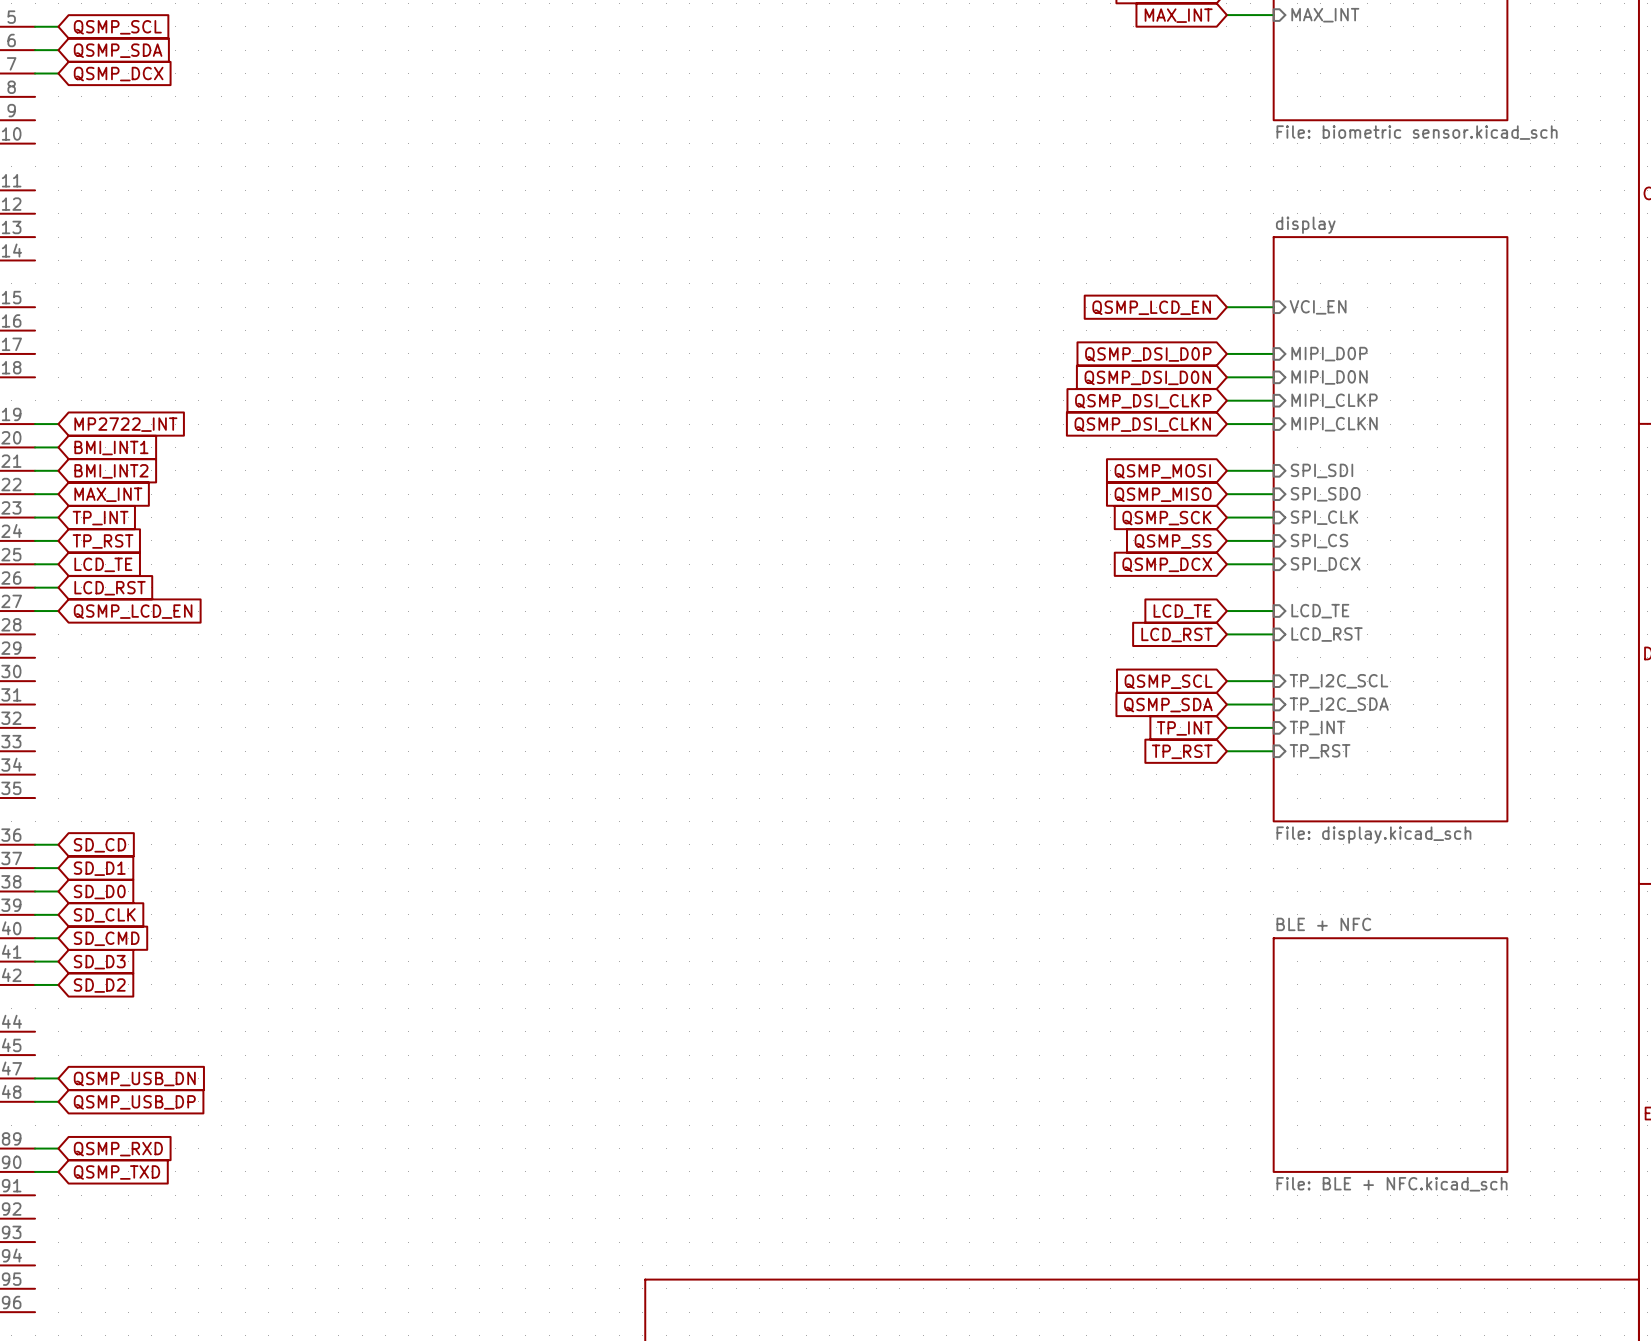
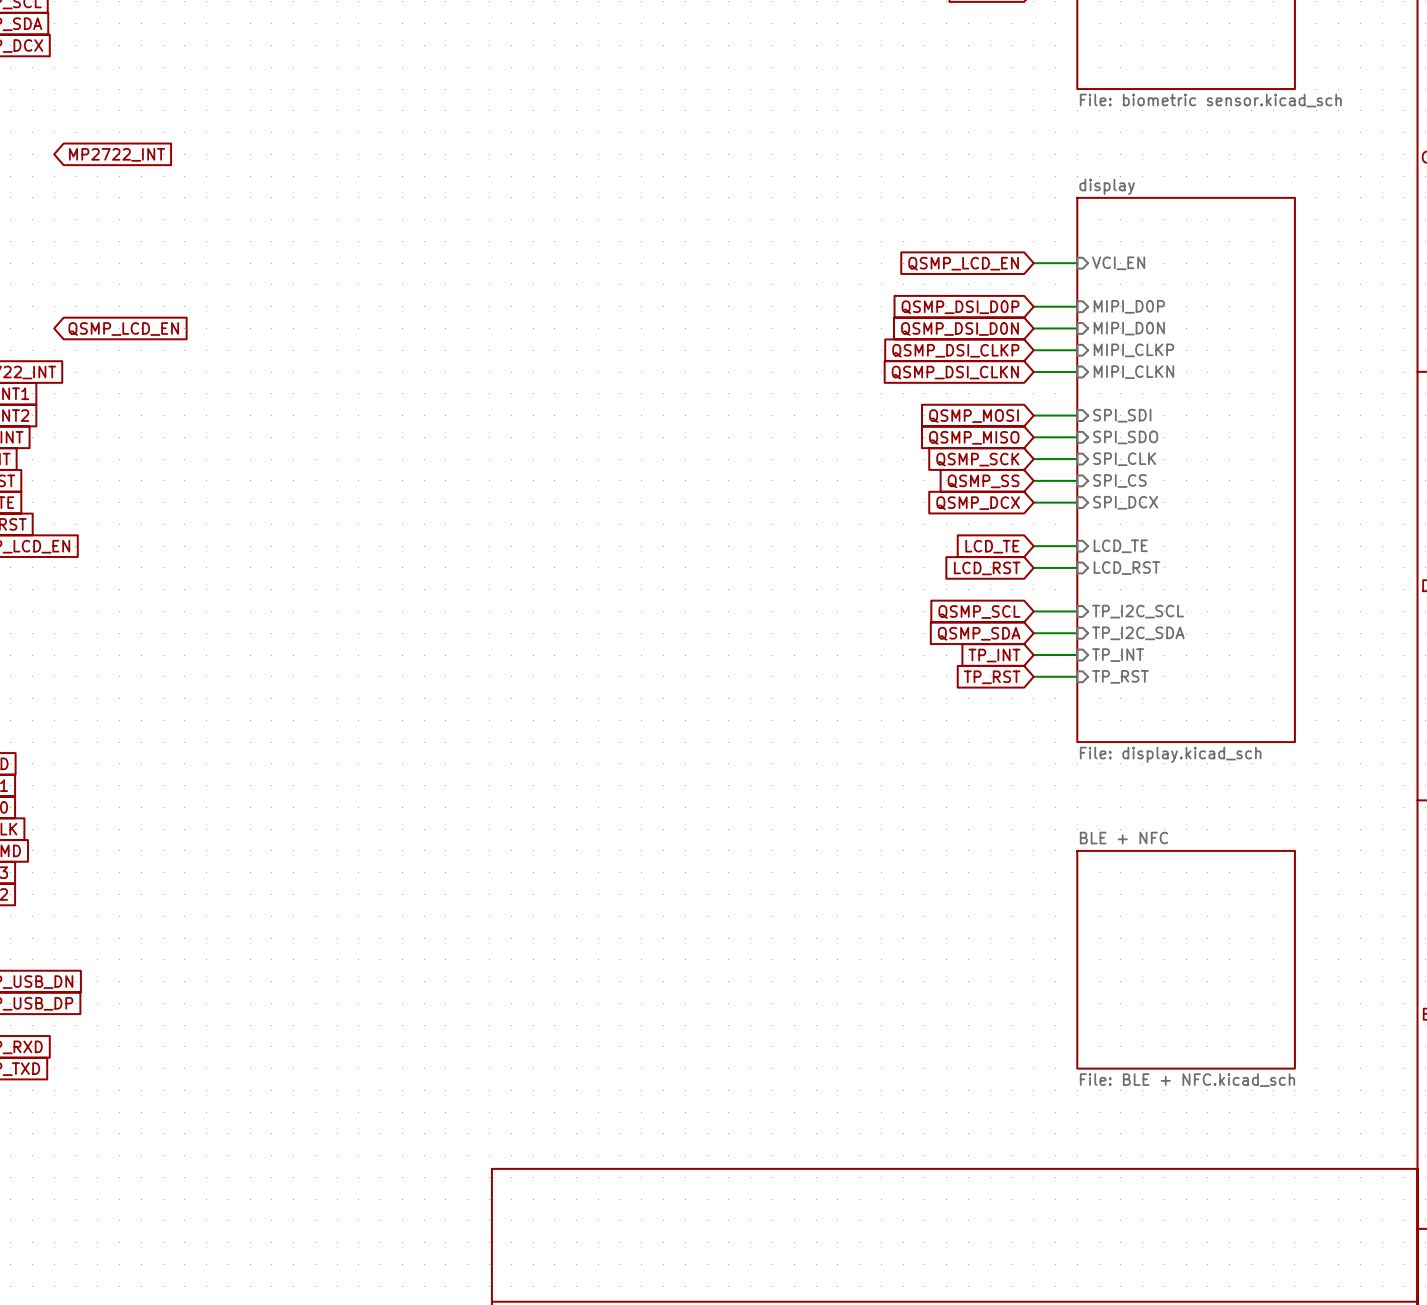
global label: none -> MP2722_INT (117, 154)
global label: none -> QSMP_LCD_EN (123, 329)

